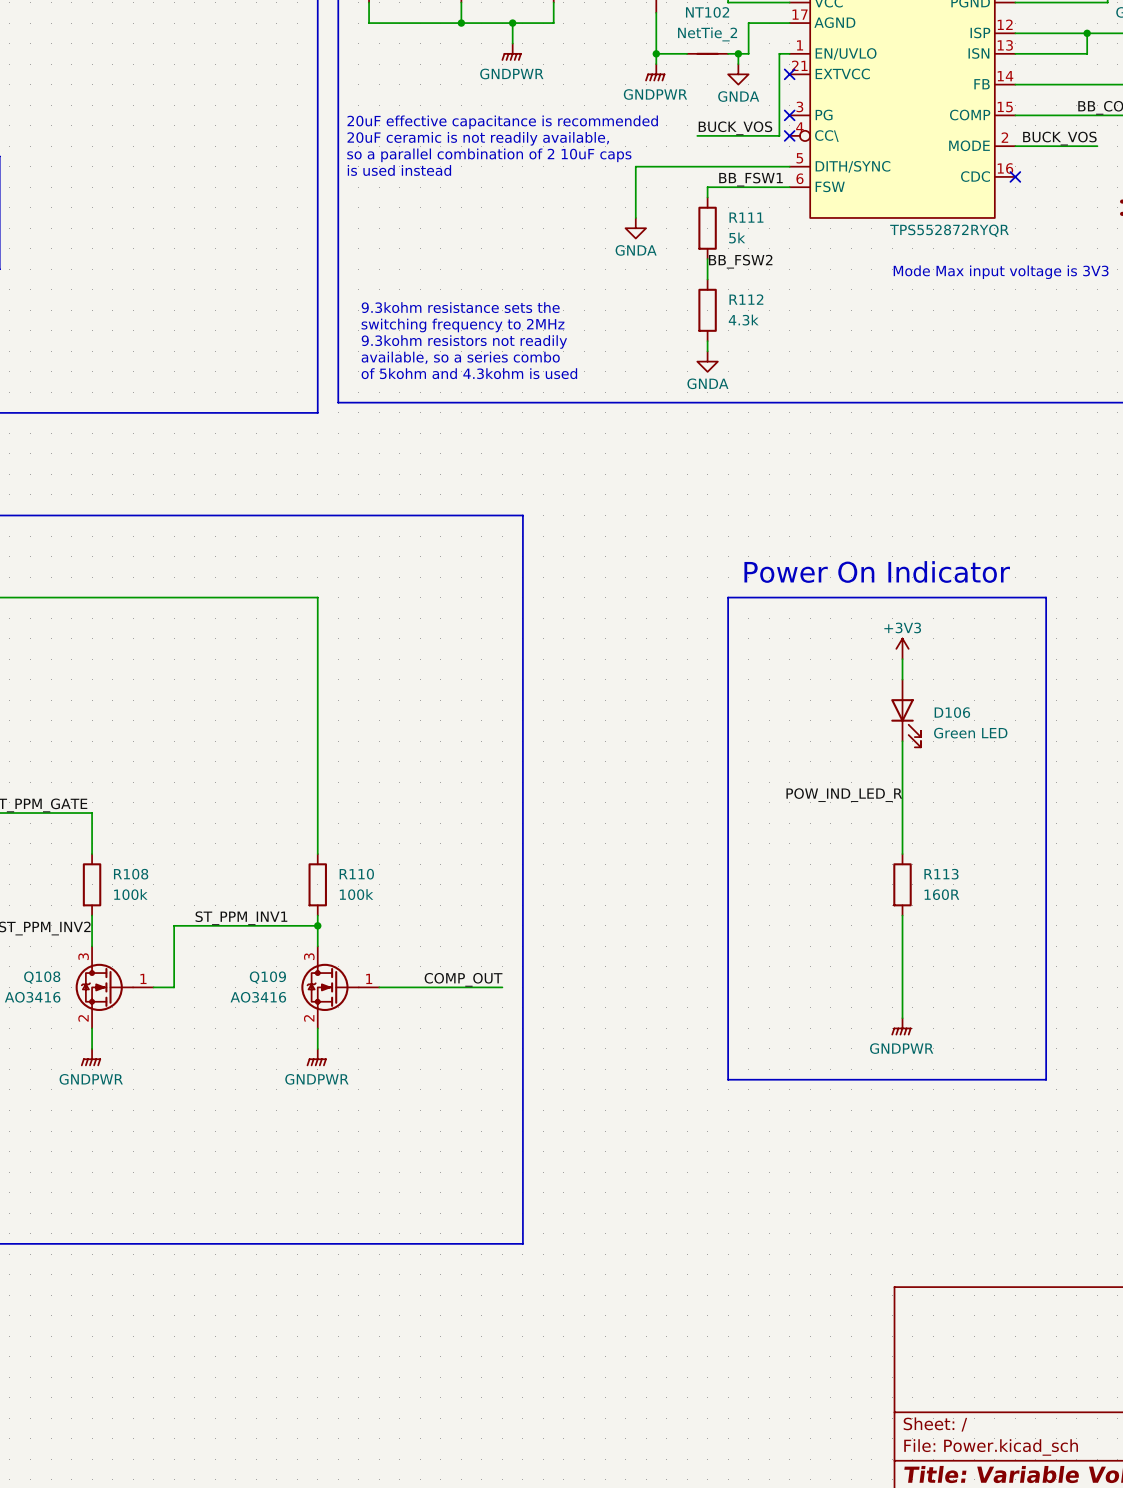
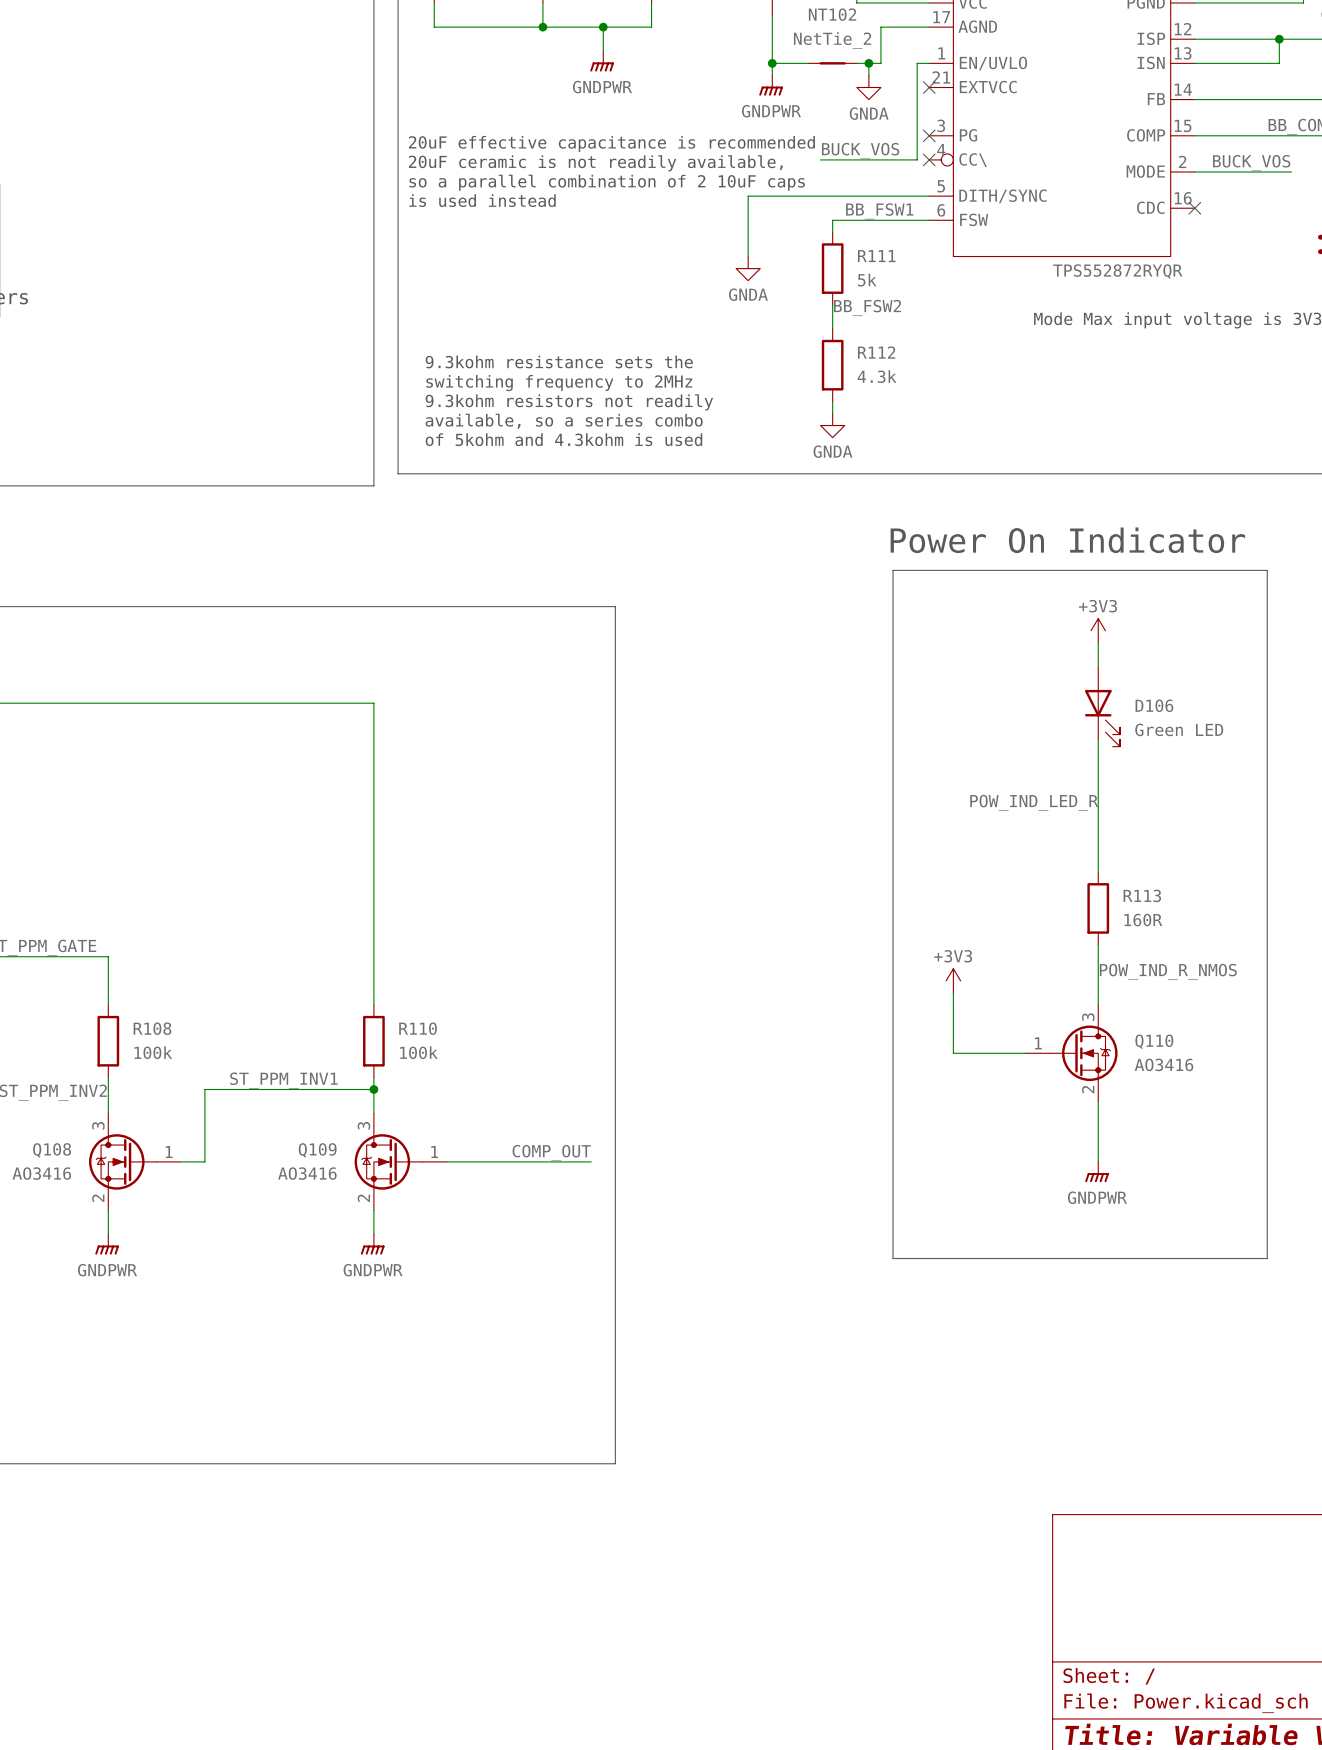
power symbol: none -> +3V3 (1098, 630)
text position: Power On Indicator (877, 571) -> Power On Indicator (1067, 540)
line: (728, 597) (1046, 597) (1046, 1079) (728, 1079) (728, 597) -> (893, 570) (893, 1258) (1267, 1258) (1267, 570) (893, 570)
power symbol: +3V3 (902, 648) -> none
wire: (902, 659) (902, 679) -> (1098, 642) (1098, 666)
D106 position: (906, 713) -> (1102, 706)
wire: (902, 741) (902, 854) -> (1098, 739) (1098, 872)
label position: POW_IND_LED_R (844, 795) -> POW_IND_LED_R (1034, 802)
wire: none -> (1098, 944) (1098, 1005)
label: none -> POW_IND_R_NMOS (1168, 971)
power symbol: none -> +3V3 (953, 980)
wire: none -> (953, 992) (953, 1053) (1025, 1053)
R113 position: (902, 884) -> (1098, 908)
Q110: none -> AO3416 (1071, 1053)
wire: (902, 915) (902, 1018) -> none
wire: none -> (1098, 1101) (1098, 1161)
power symbol position: GNDPWR (901, 1026) -> GNDPWR (1097, 1172)

